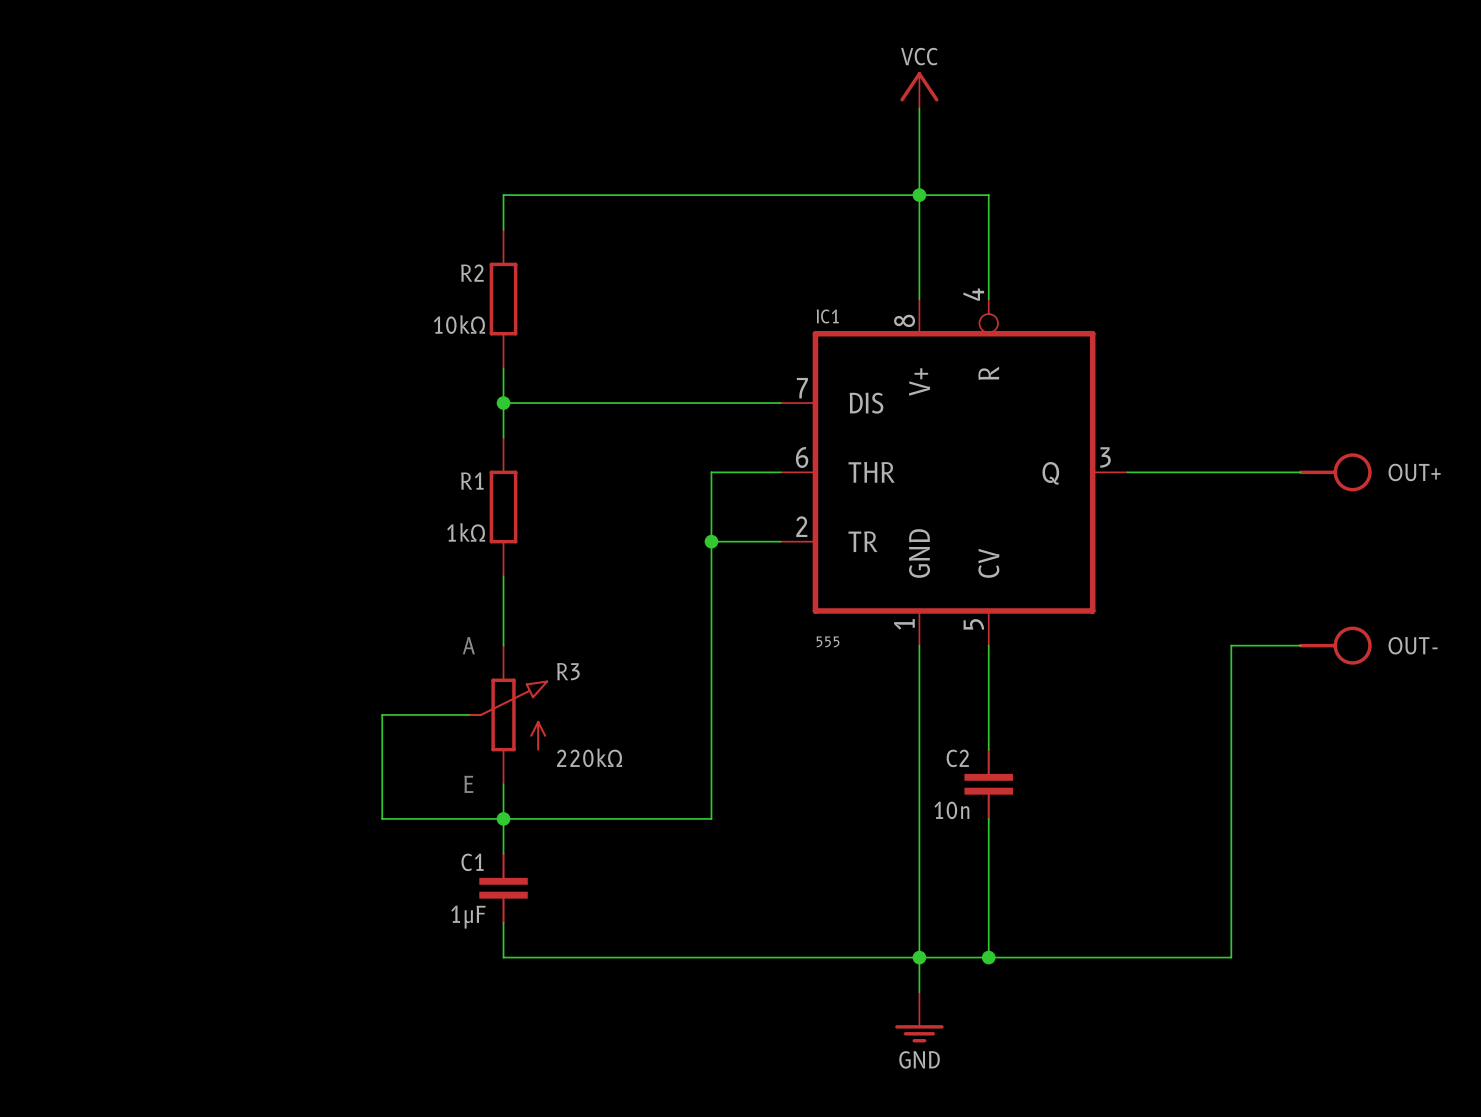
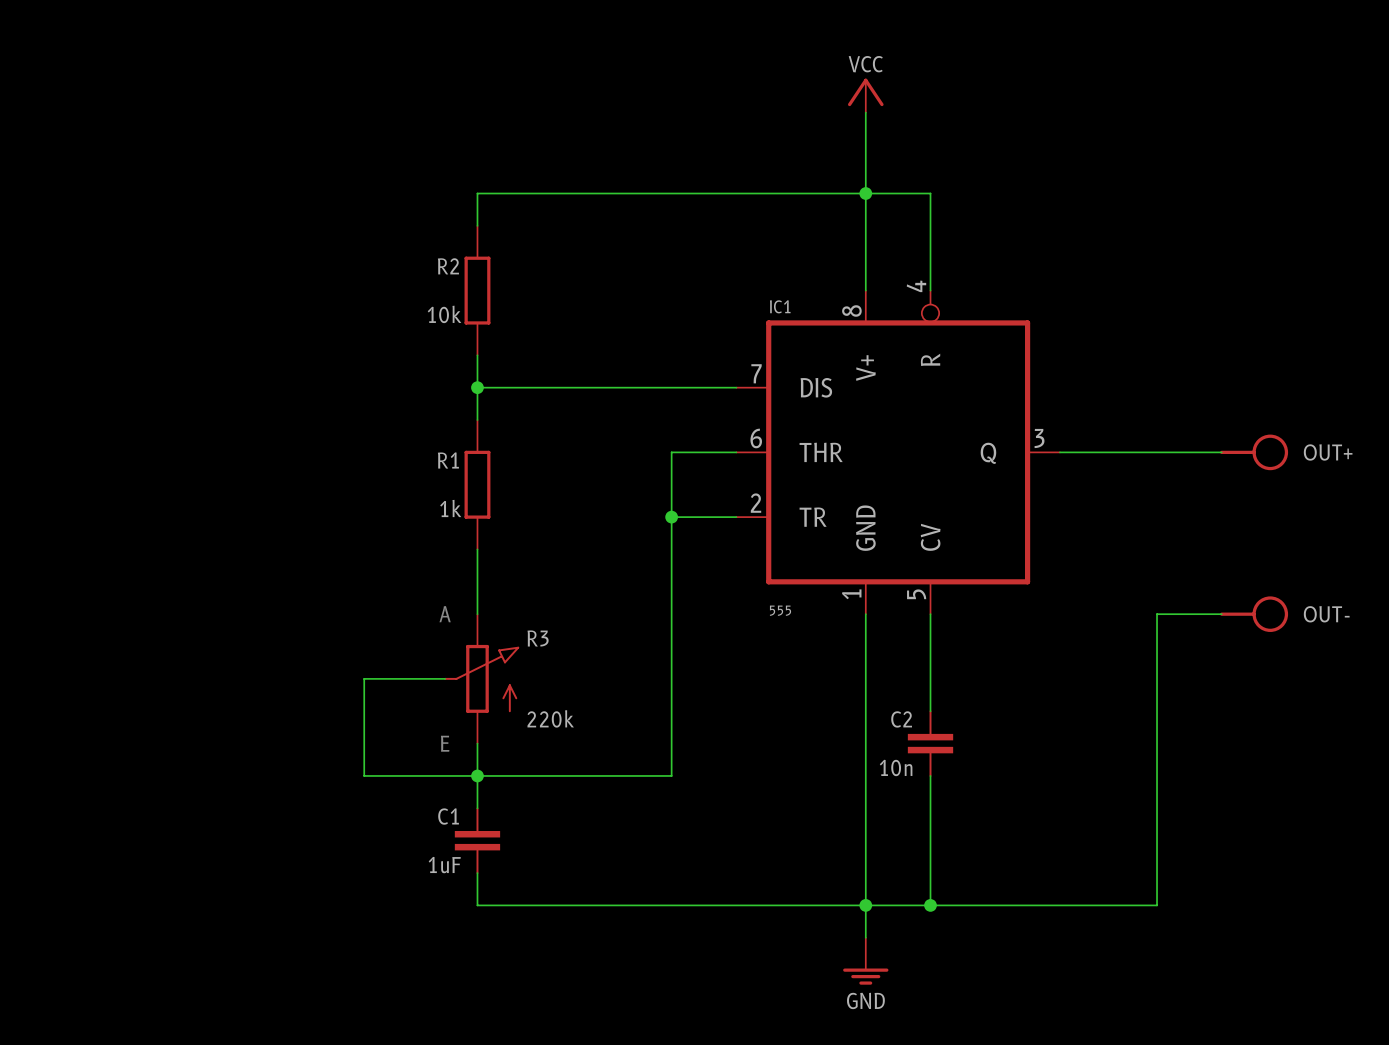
R2 value: 10kΩ (459, 324) -> 10k (444, 314)
R1 value: 1kΩ (466, 532) -> 1k (450, 508)
R3 value: 220kΩ (589, 757) -> 220k (550, 718)
C1 value: 1μF (468, 917) -> 1uF (444, 865)

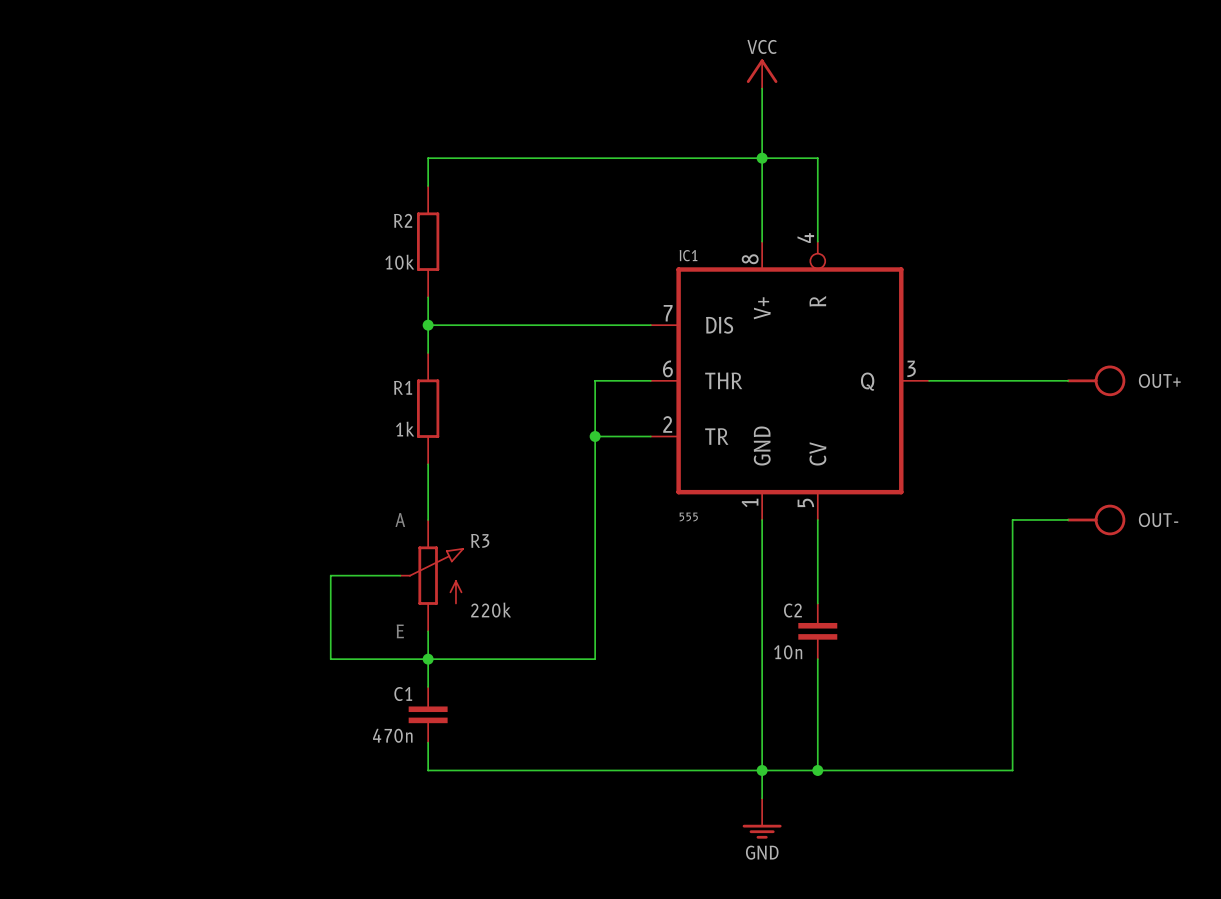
C1 value: 1uF (444, 865) -> 470n (392, 735)

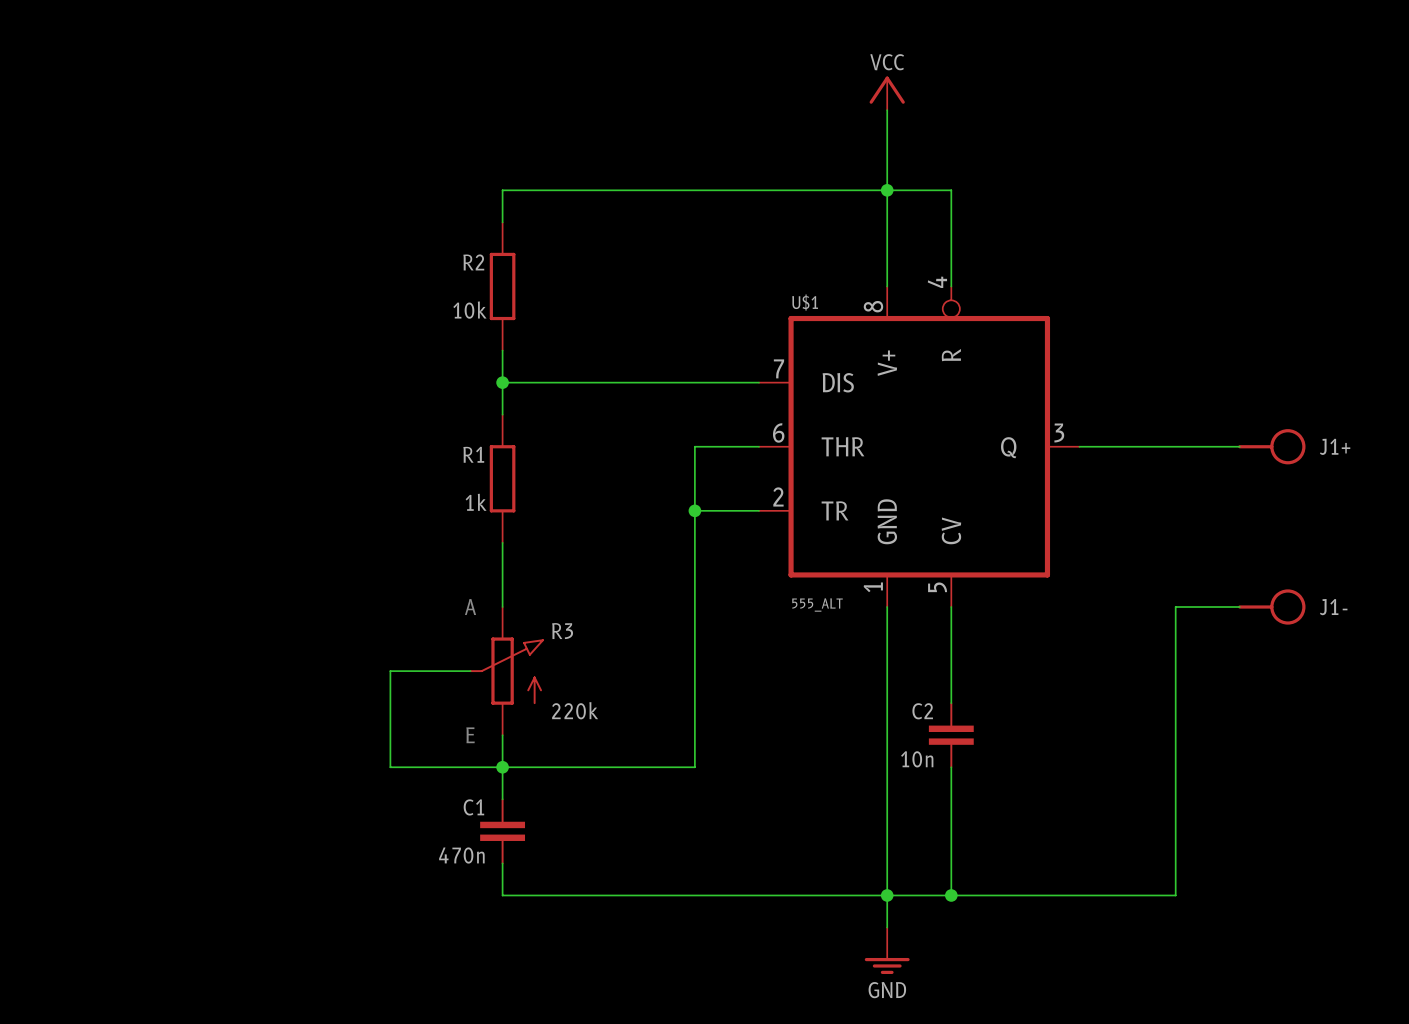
IC1 name: IC1 (688, 255) -> U$1 (805, 302)
OUT+ name: OUT+ (1159, 380) -> J1+ (1335, 446)
IC1 value: 555 (688, 516) -> 555_ALT (817, 605)
OUT- name: OUT- (1158, 520) -> J1- (1333, 607)

